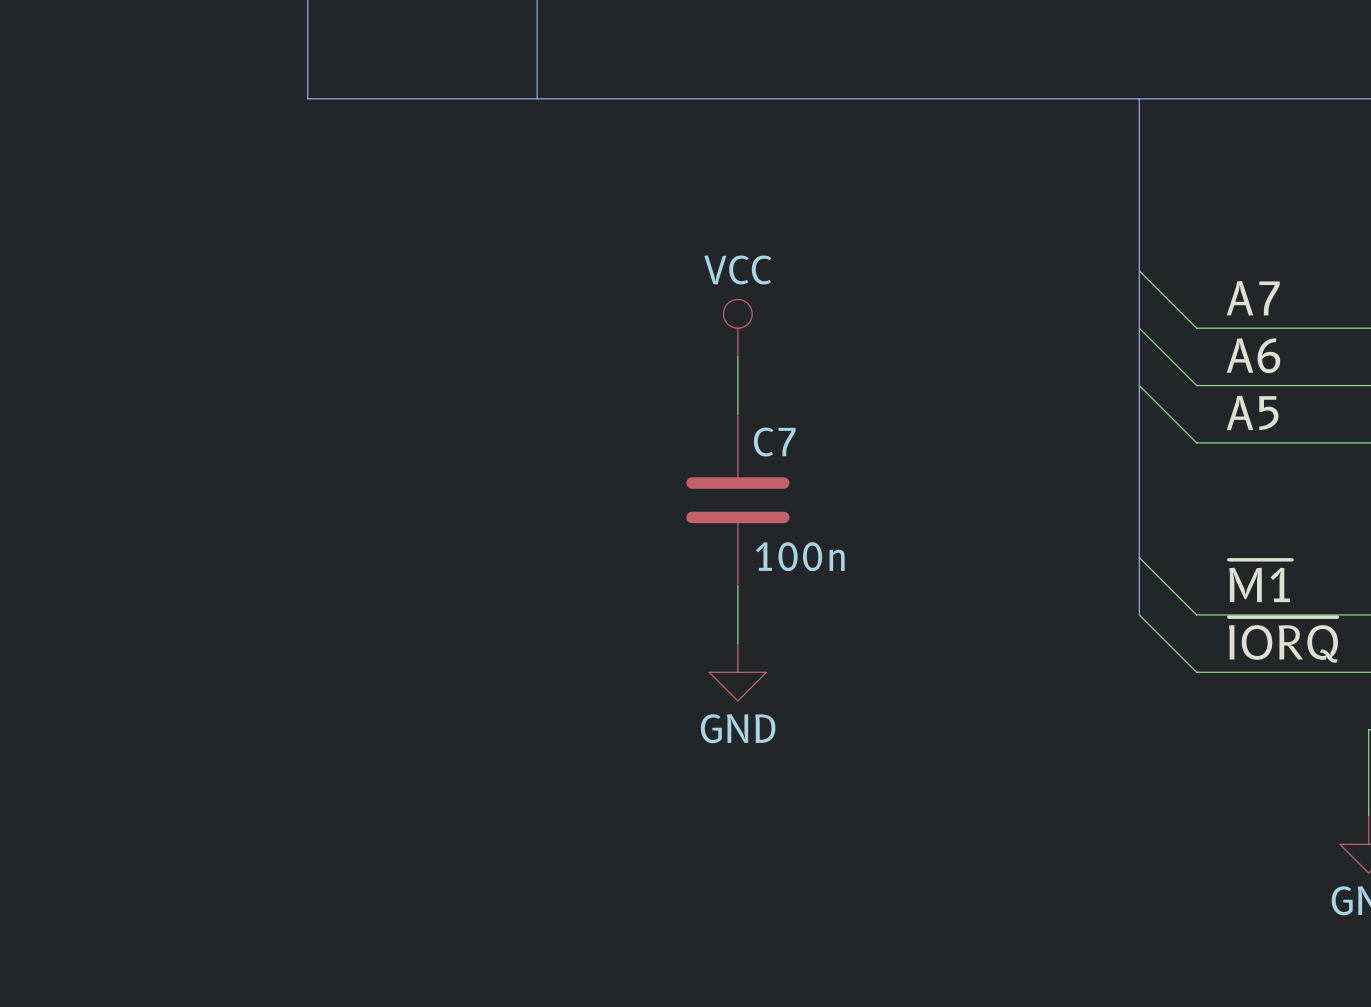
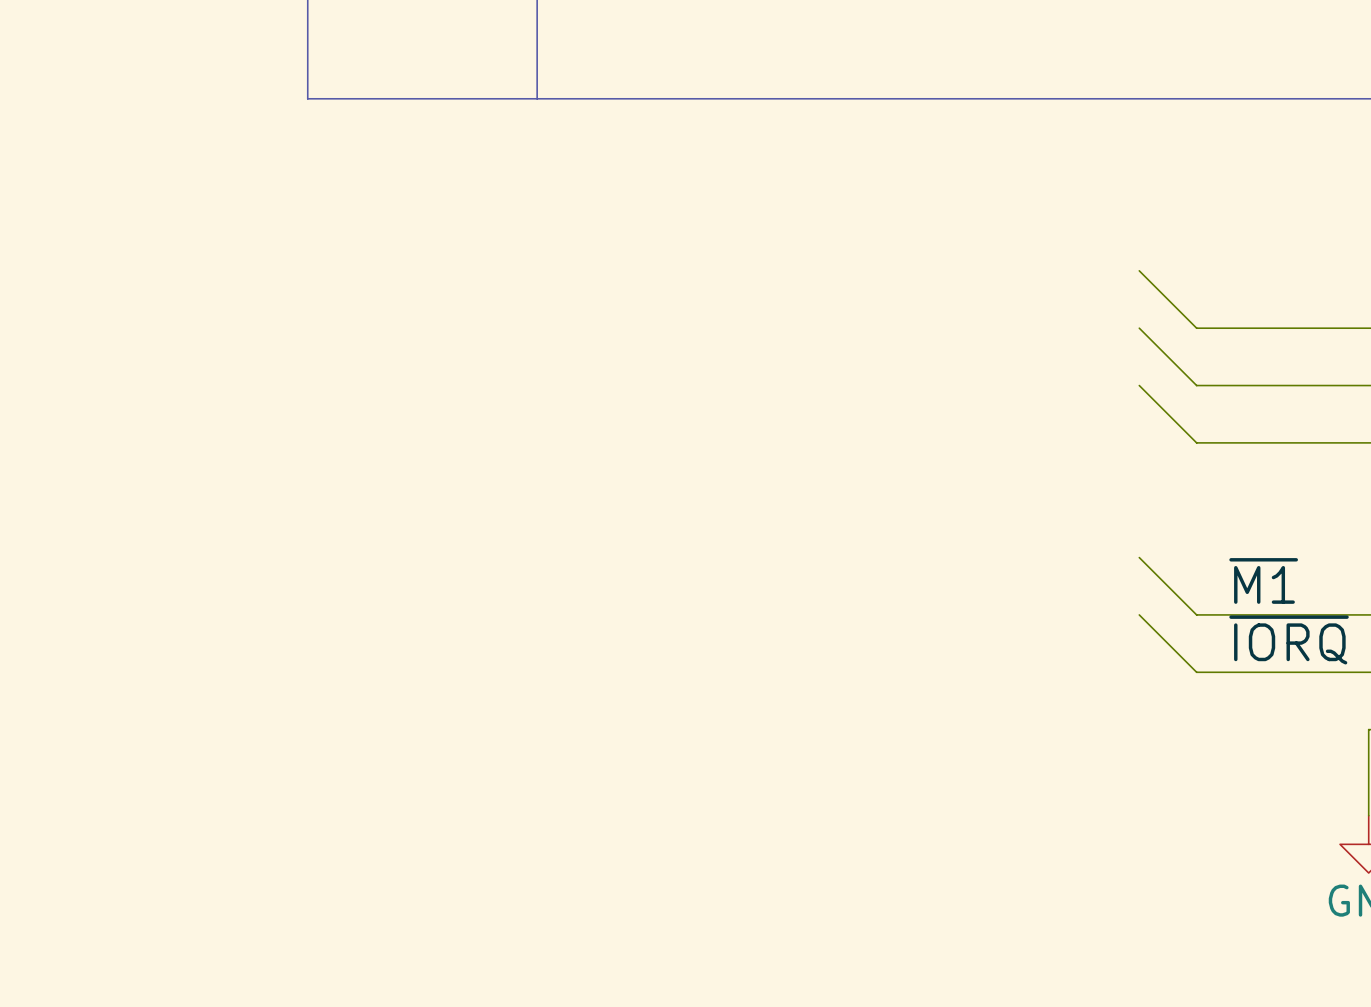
bus: (1139, 98) (1139, 614) -> none
label: A7 (1253, 298) -> none
power symbol: VCC (737, 328) -> none
label: A6 (1253, 355) -> none
wire: (737, 356) (737, 414) -> none
label: A5 (1252, 412) -> none
C7: 100n (737, 500) -> none
wire: (737, 586) (737, 643) -> none
power symbol: GND (737, 672) -> none

